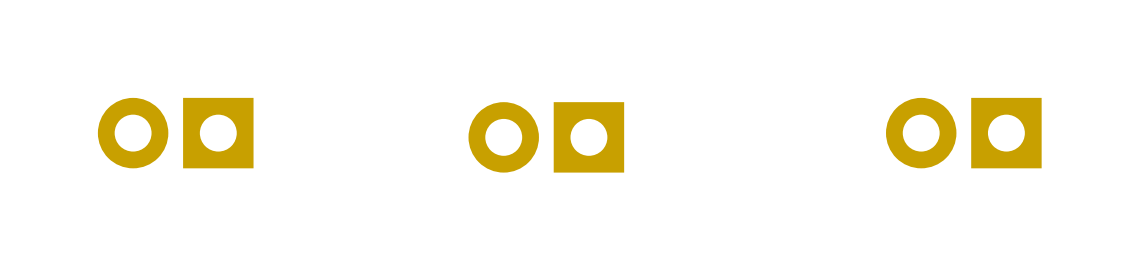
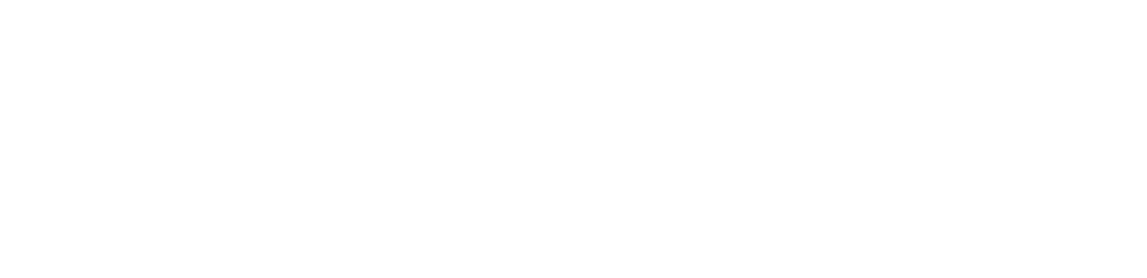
part: (175, 133) -> none
part: (963, 133) -> none
part: (546, 137) -> none

